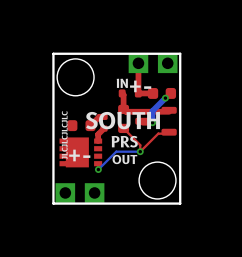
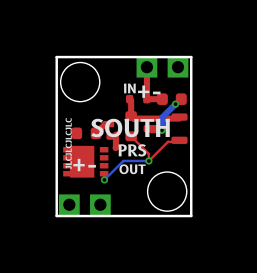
top track: none -> (115, 134) (115, 147)
top track: (103, 128) (98, 134) (98, 141) -> none

